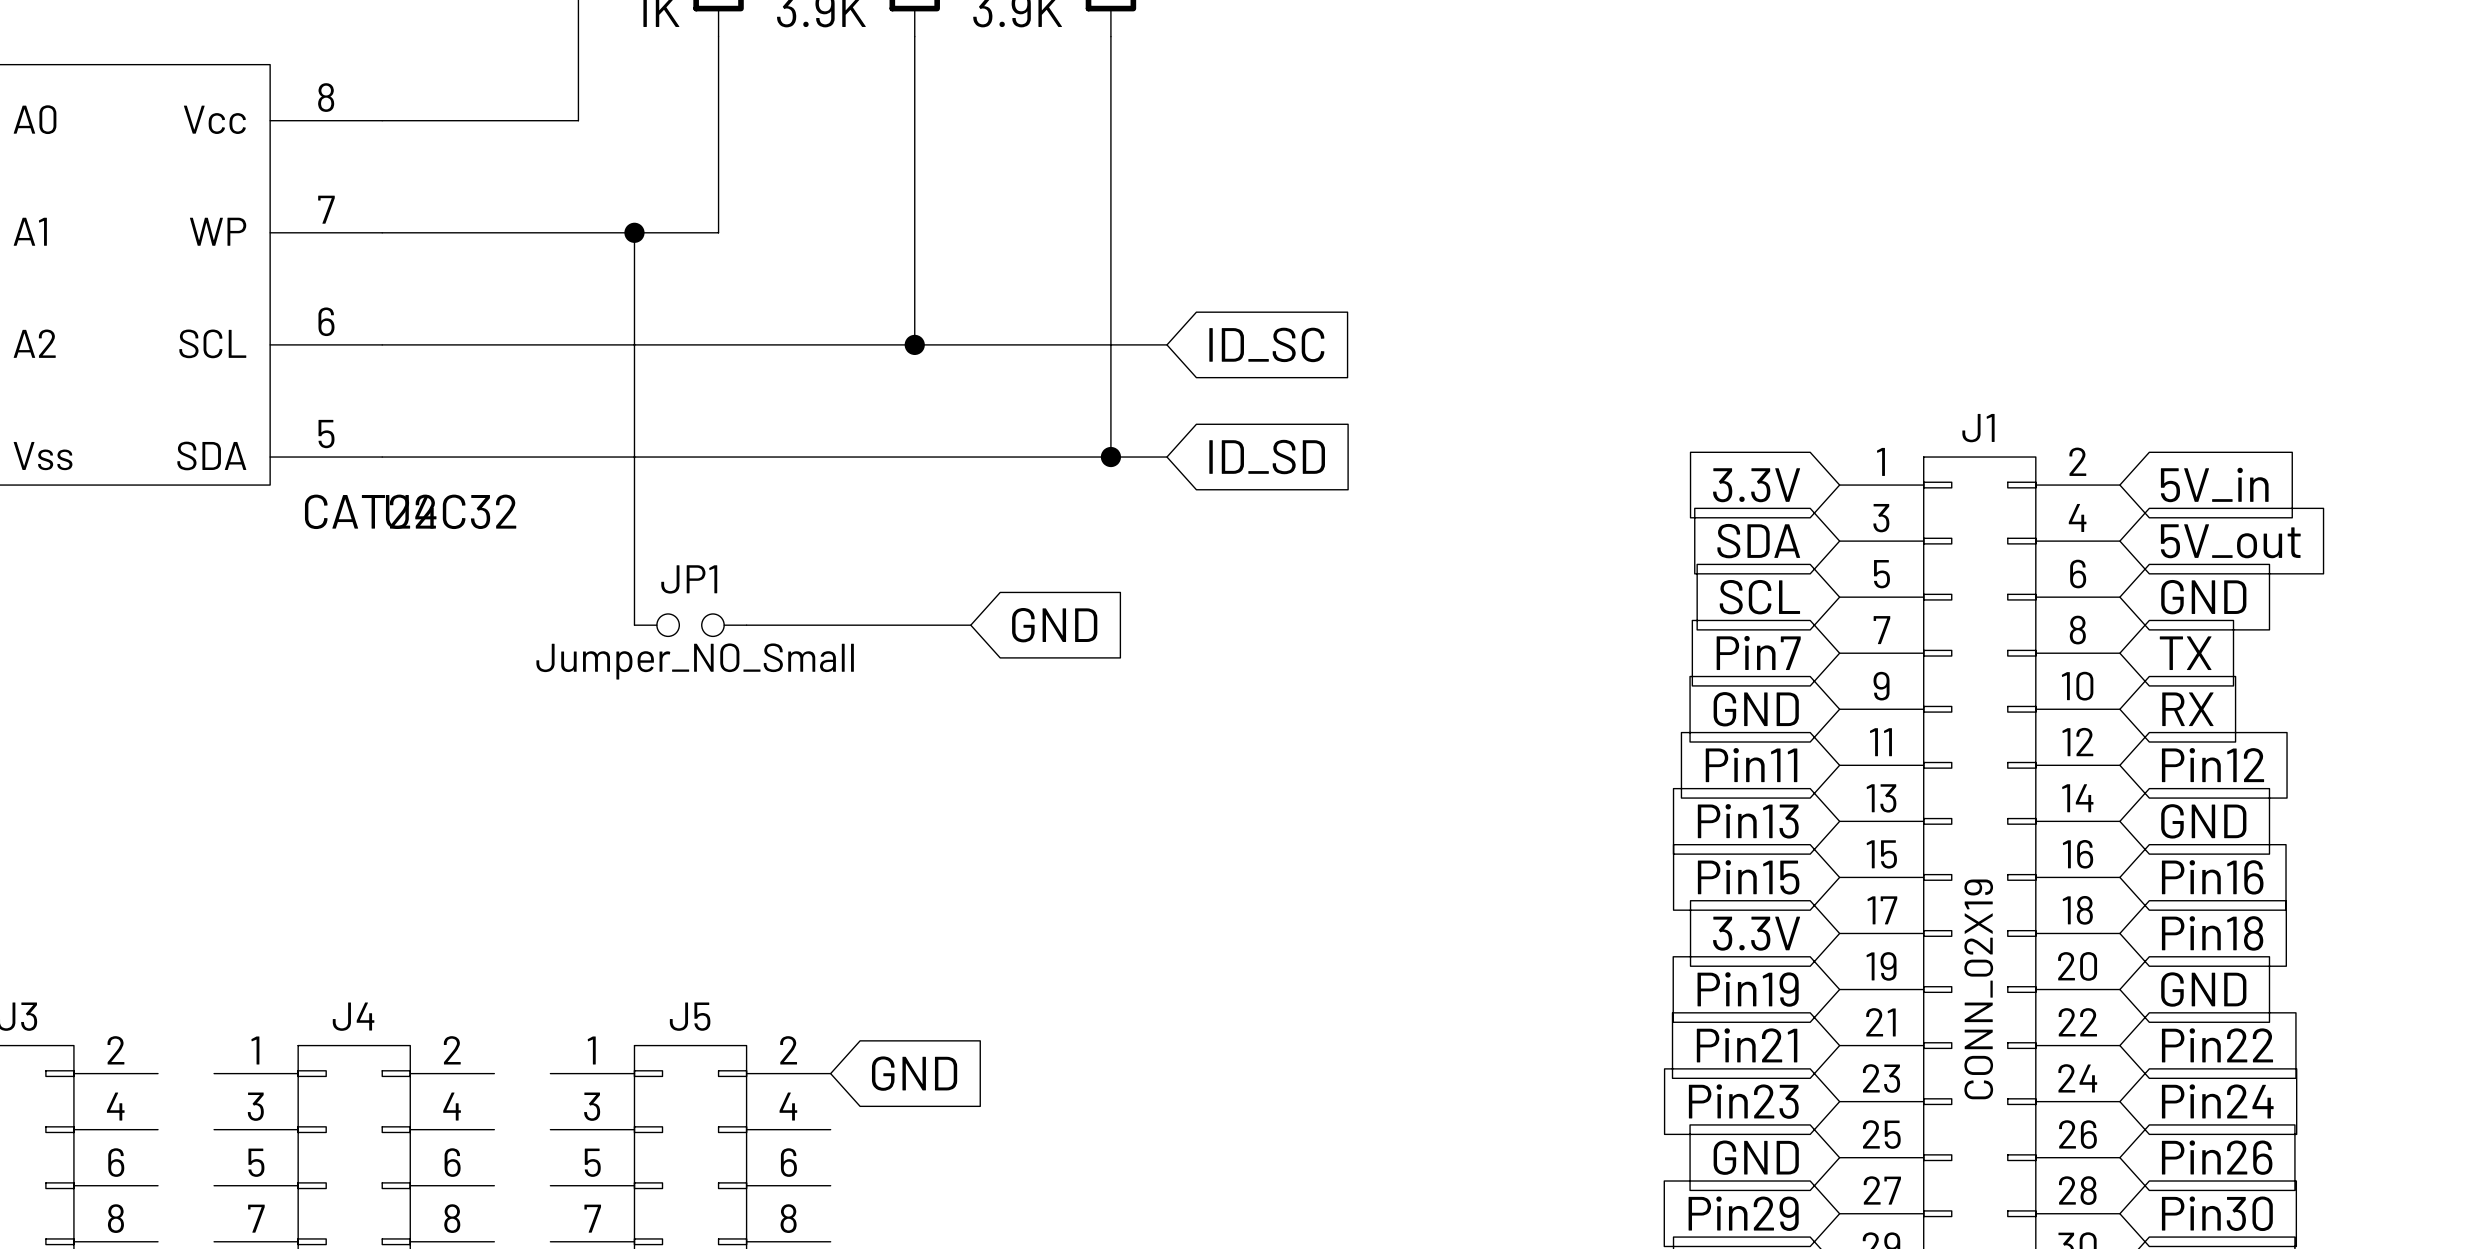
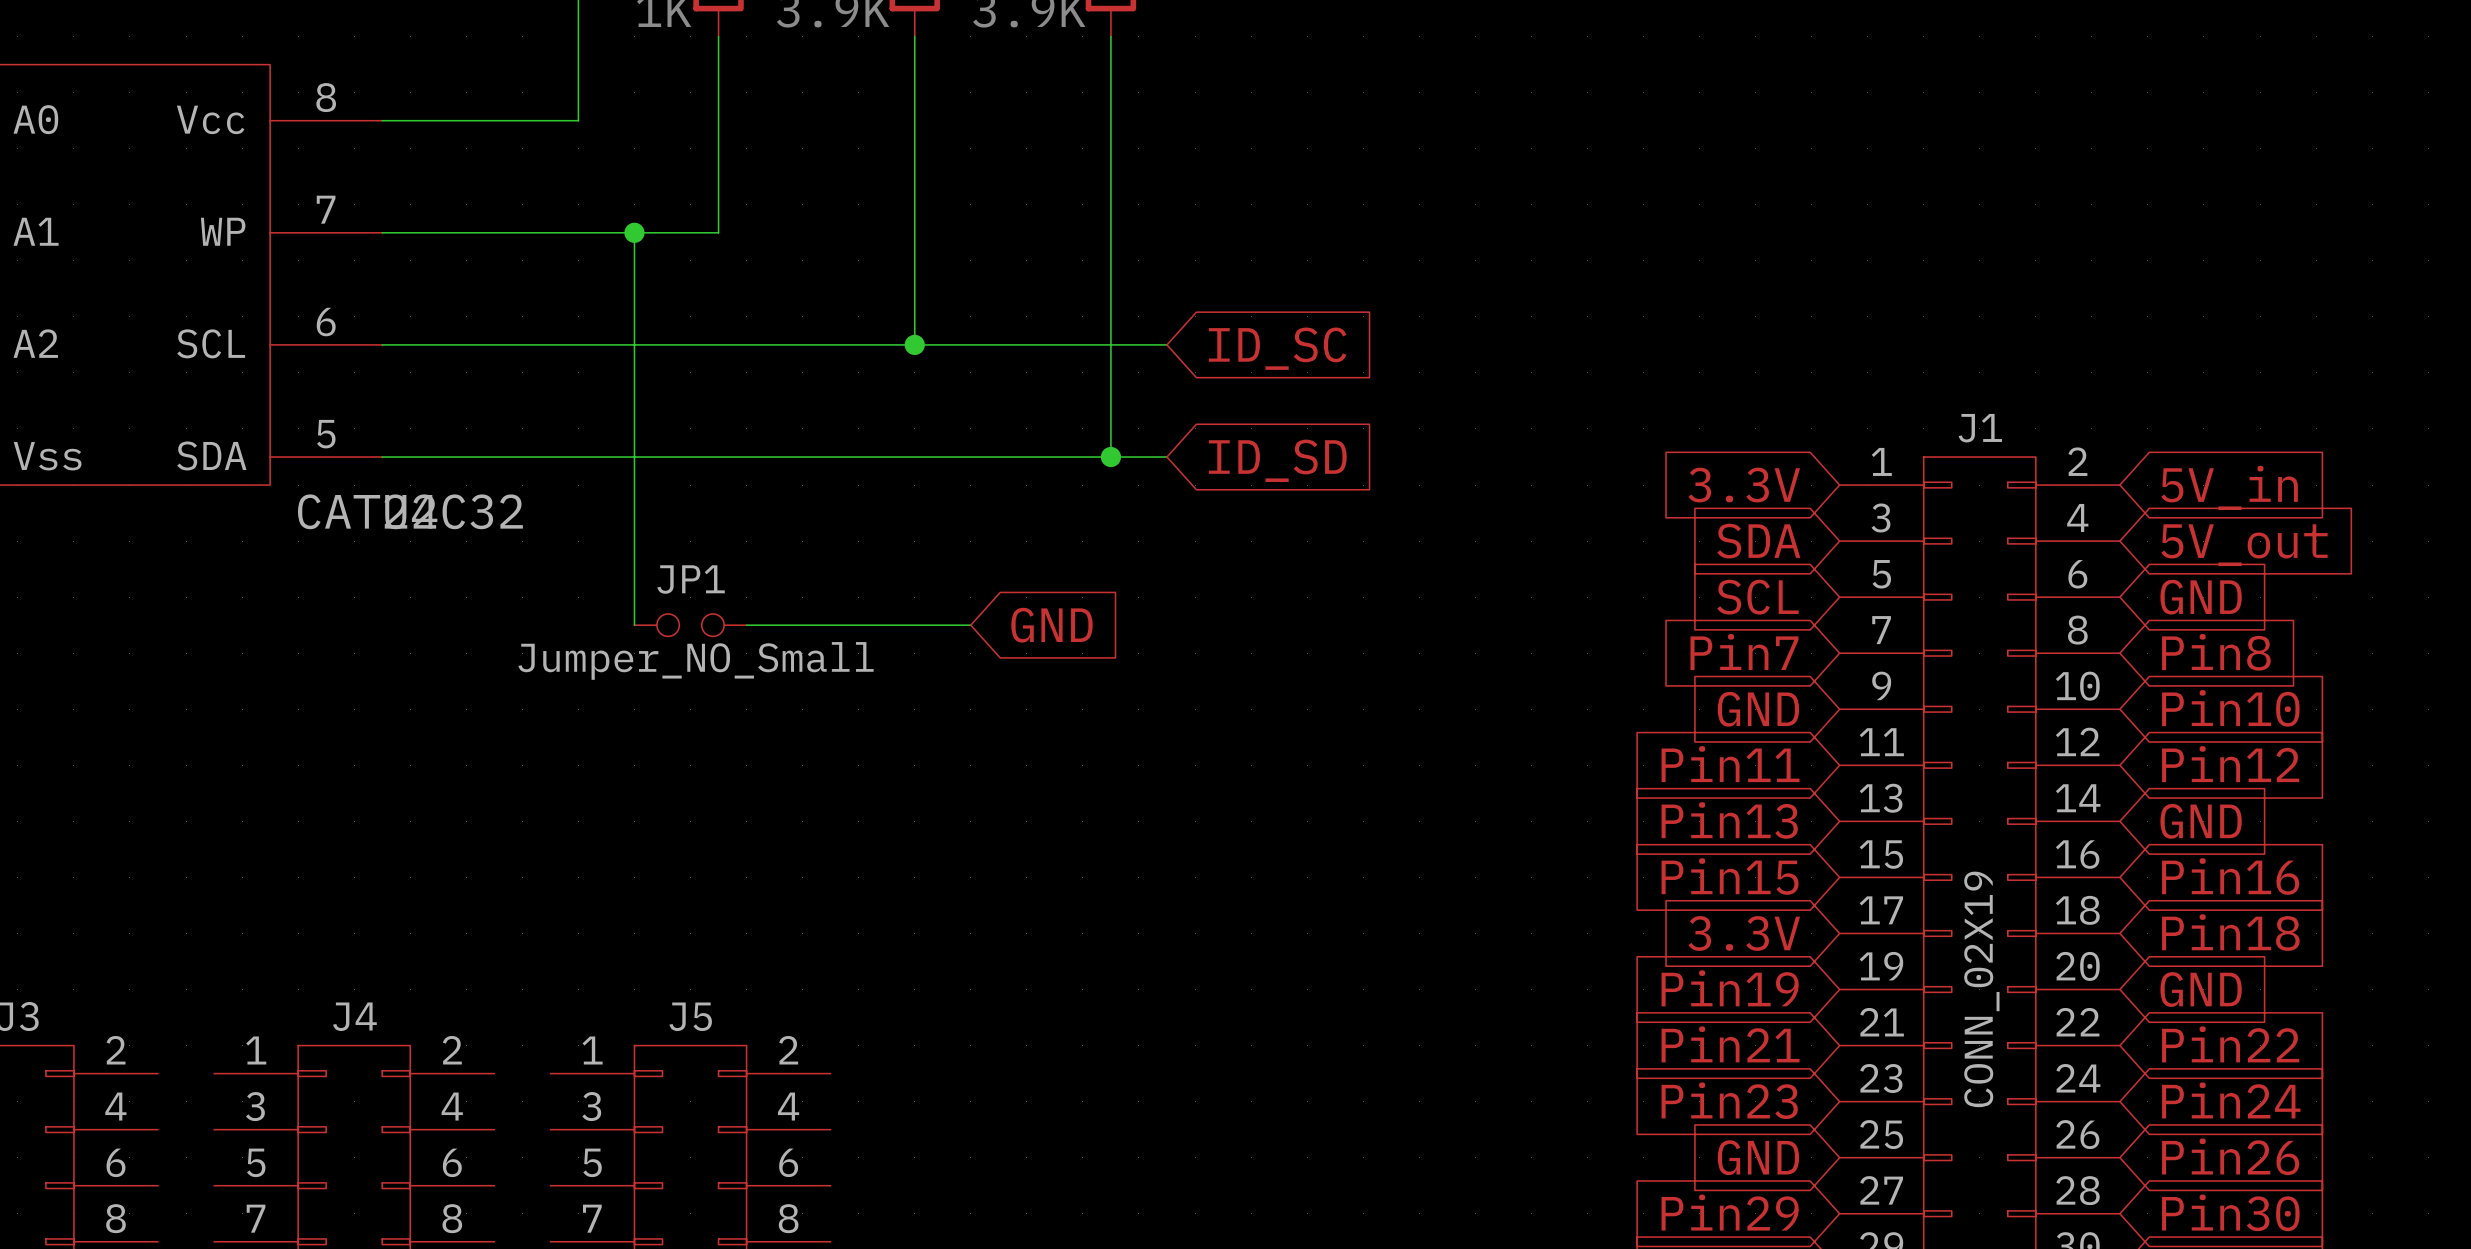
global label: TX (2185, 653) -> Pin8 (2216, 652)
global label: RX (2187, 709) -> Pin10 (2230, 708)
global label: GND (914, 1073) -> none

